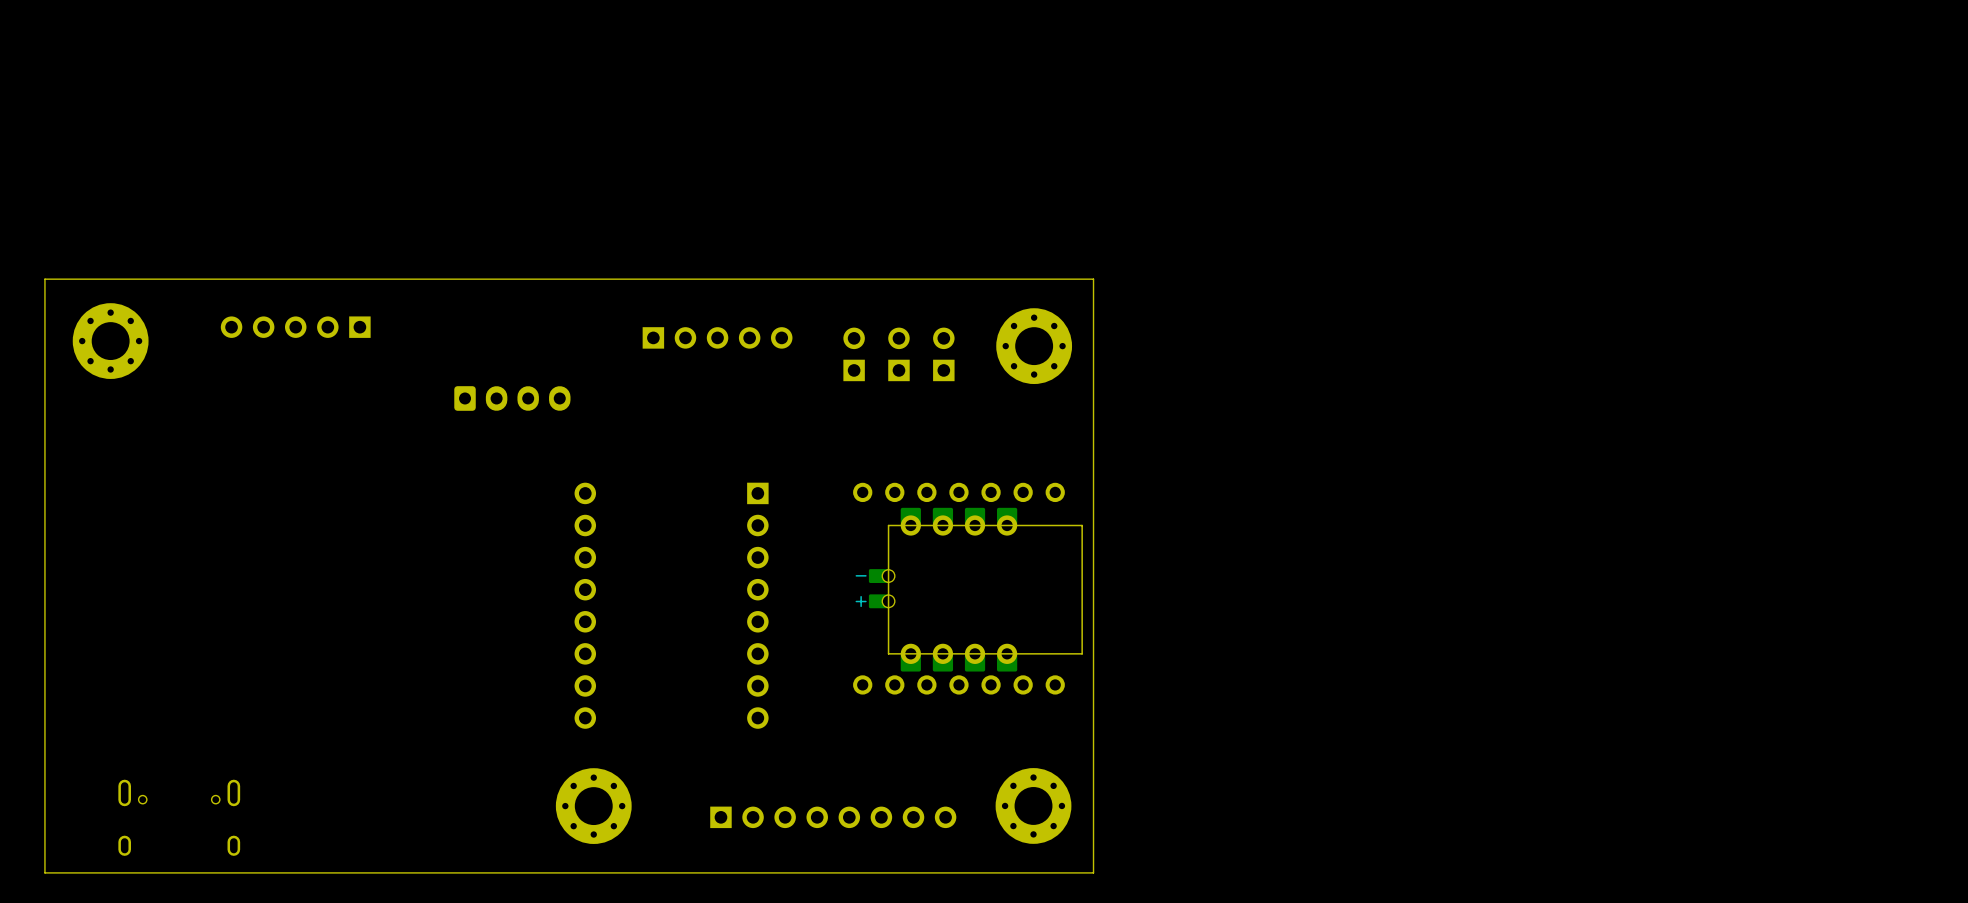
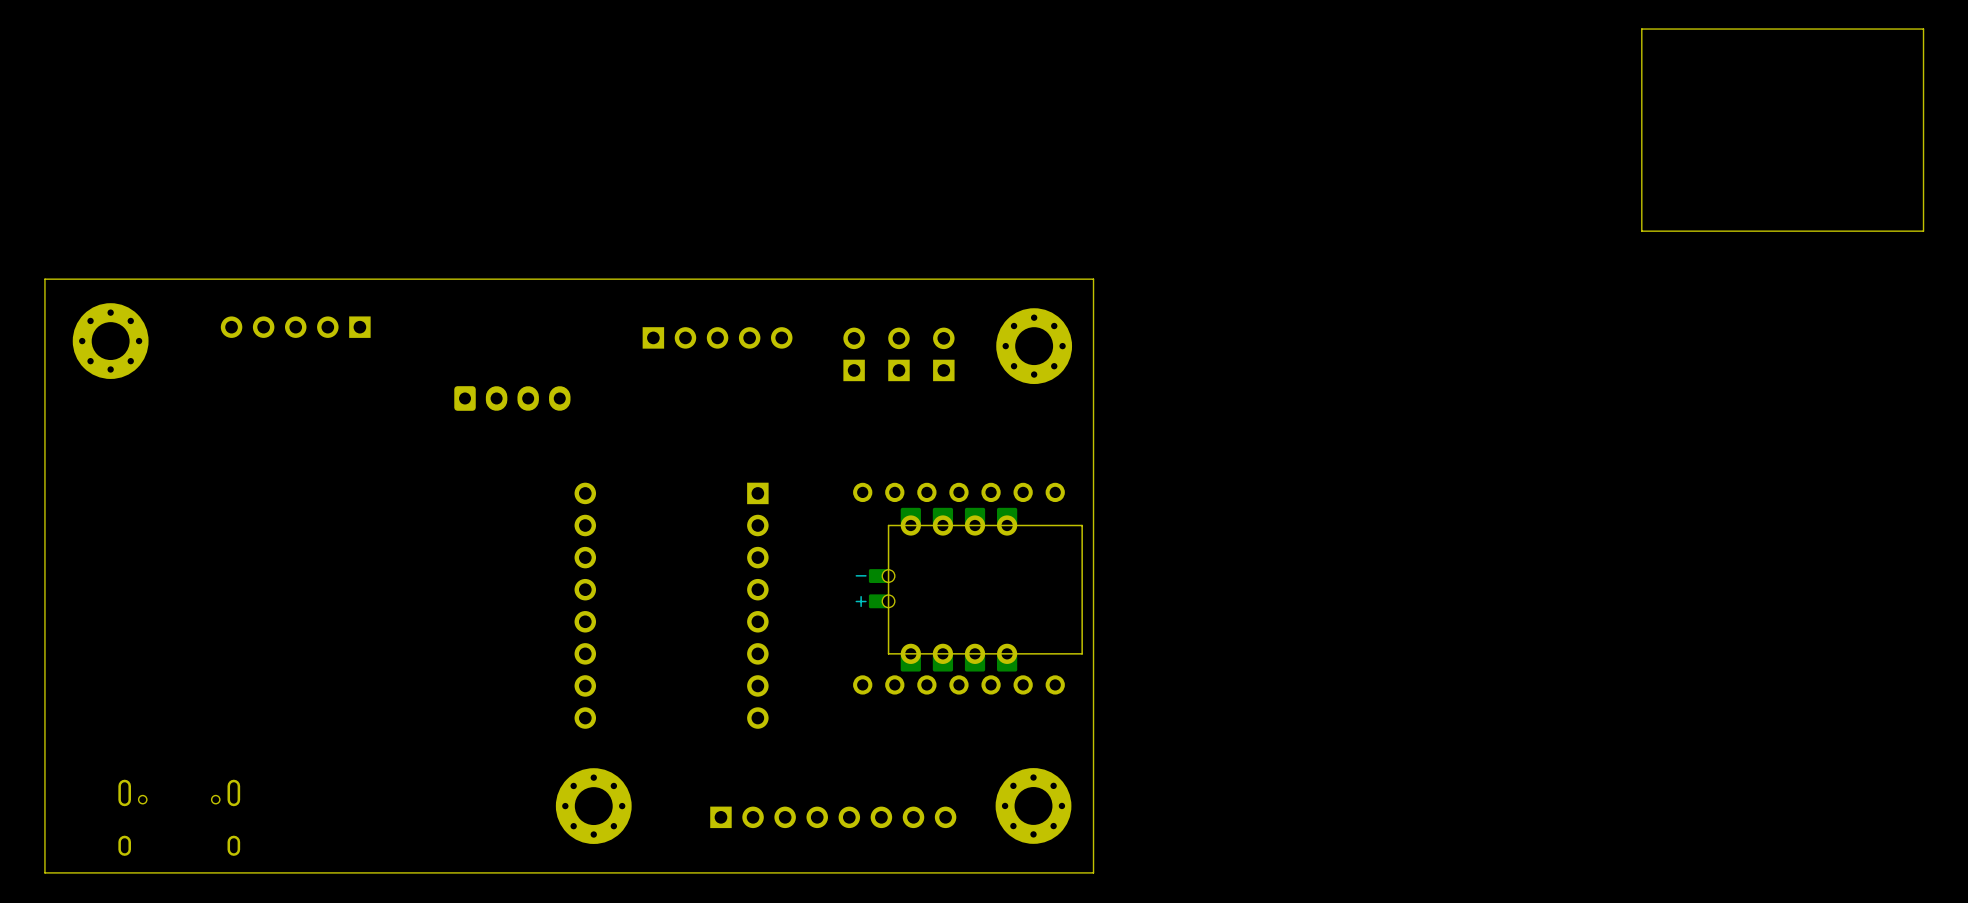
board edge: none -> (1923, 29) (1641, 29) (1641, 231) (1923, 231) (1923, 29)

